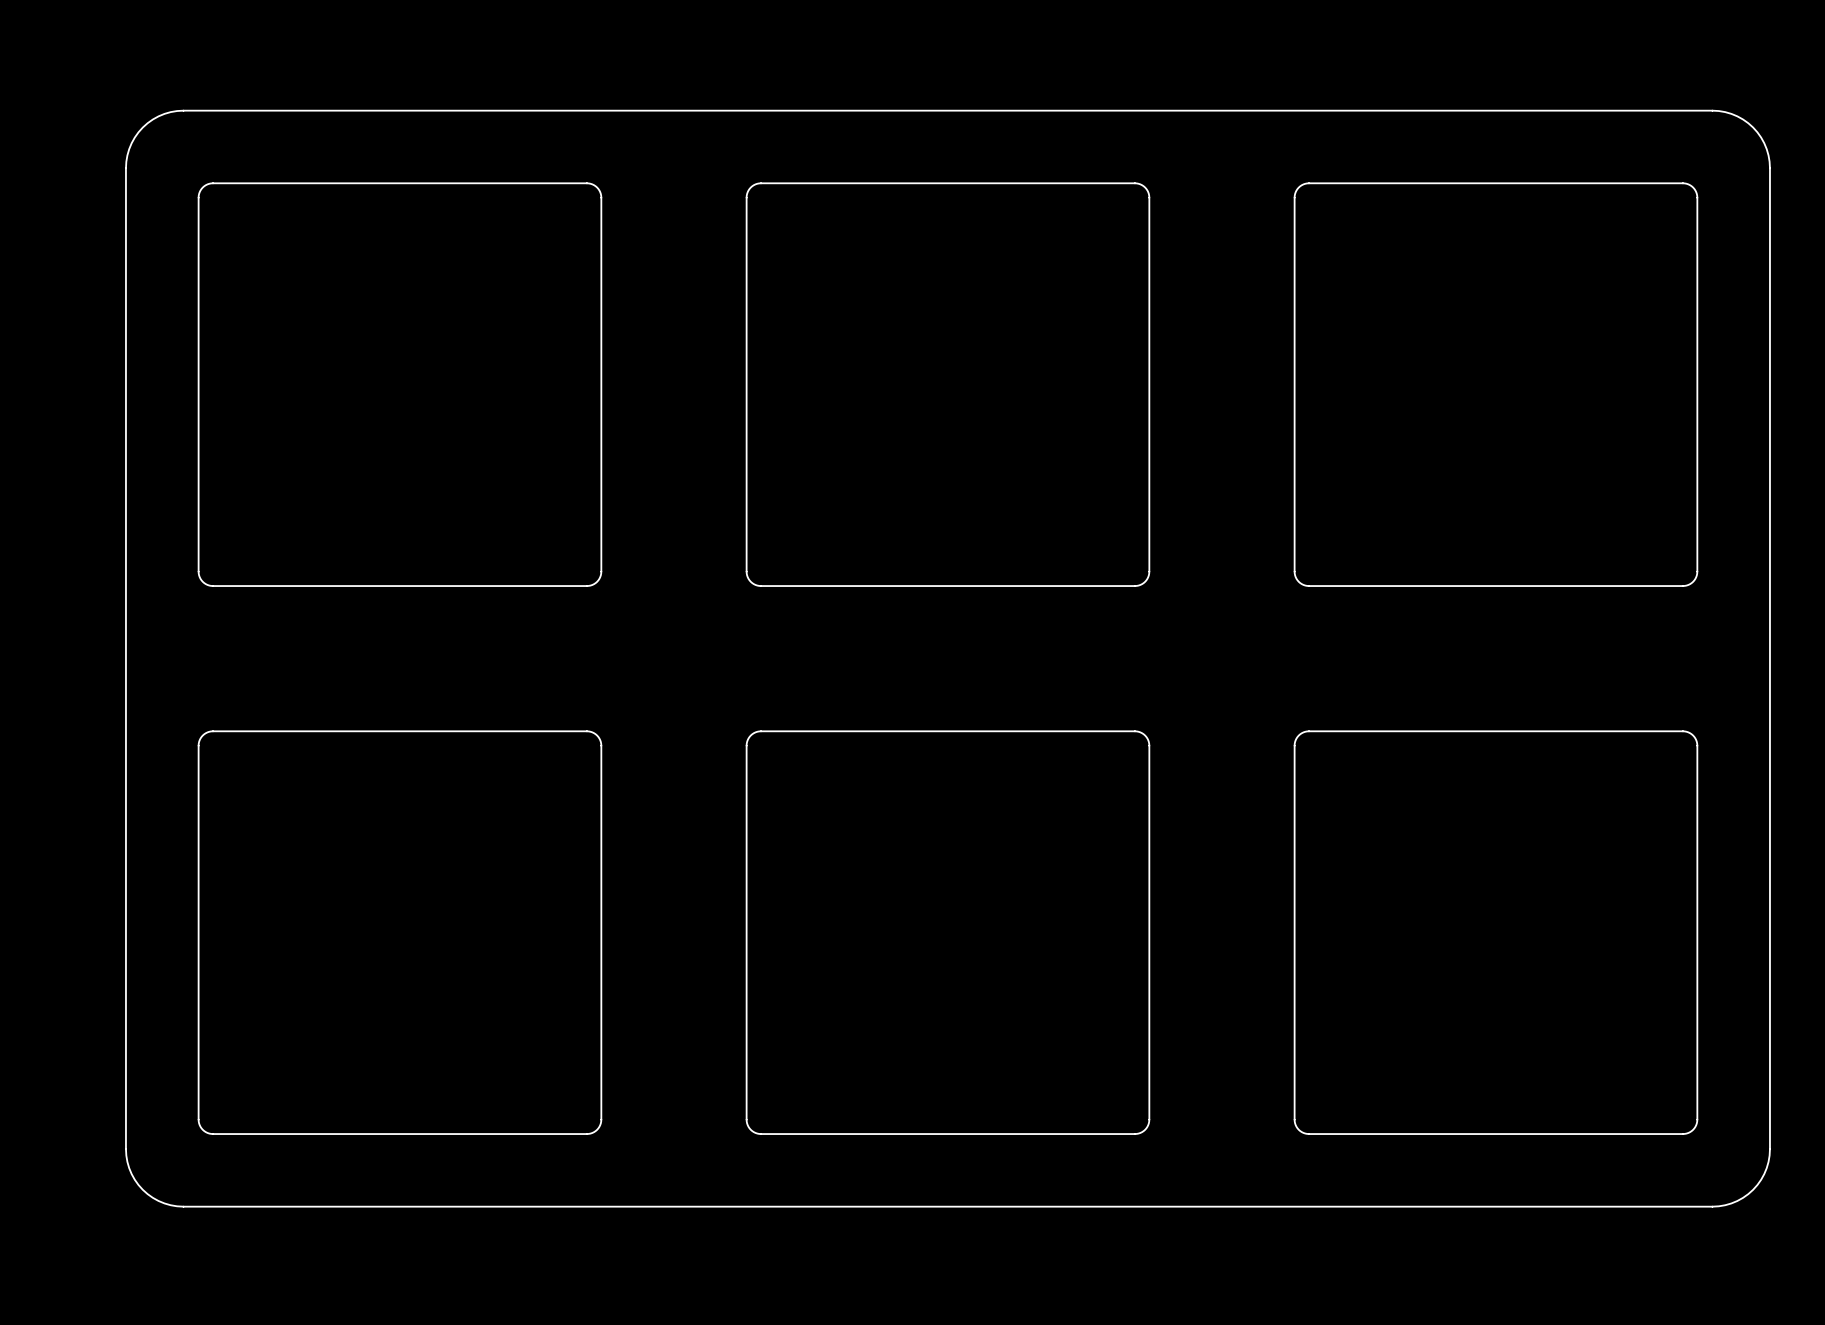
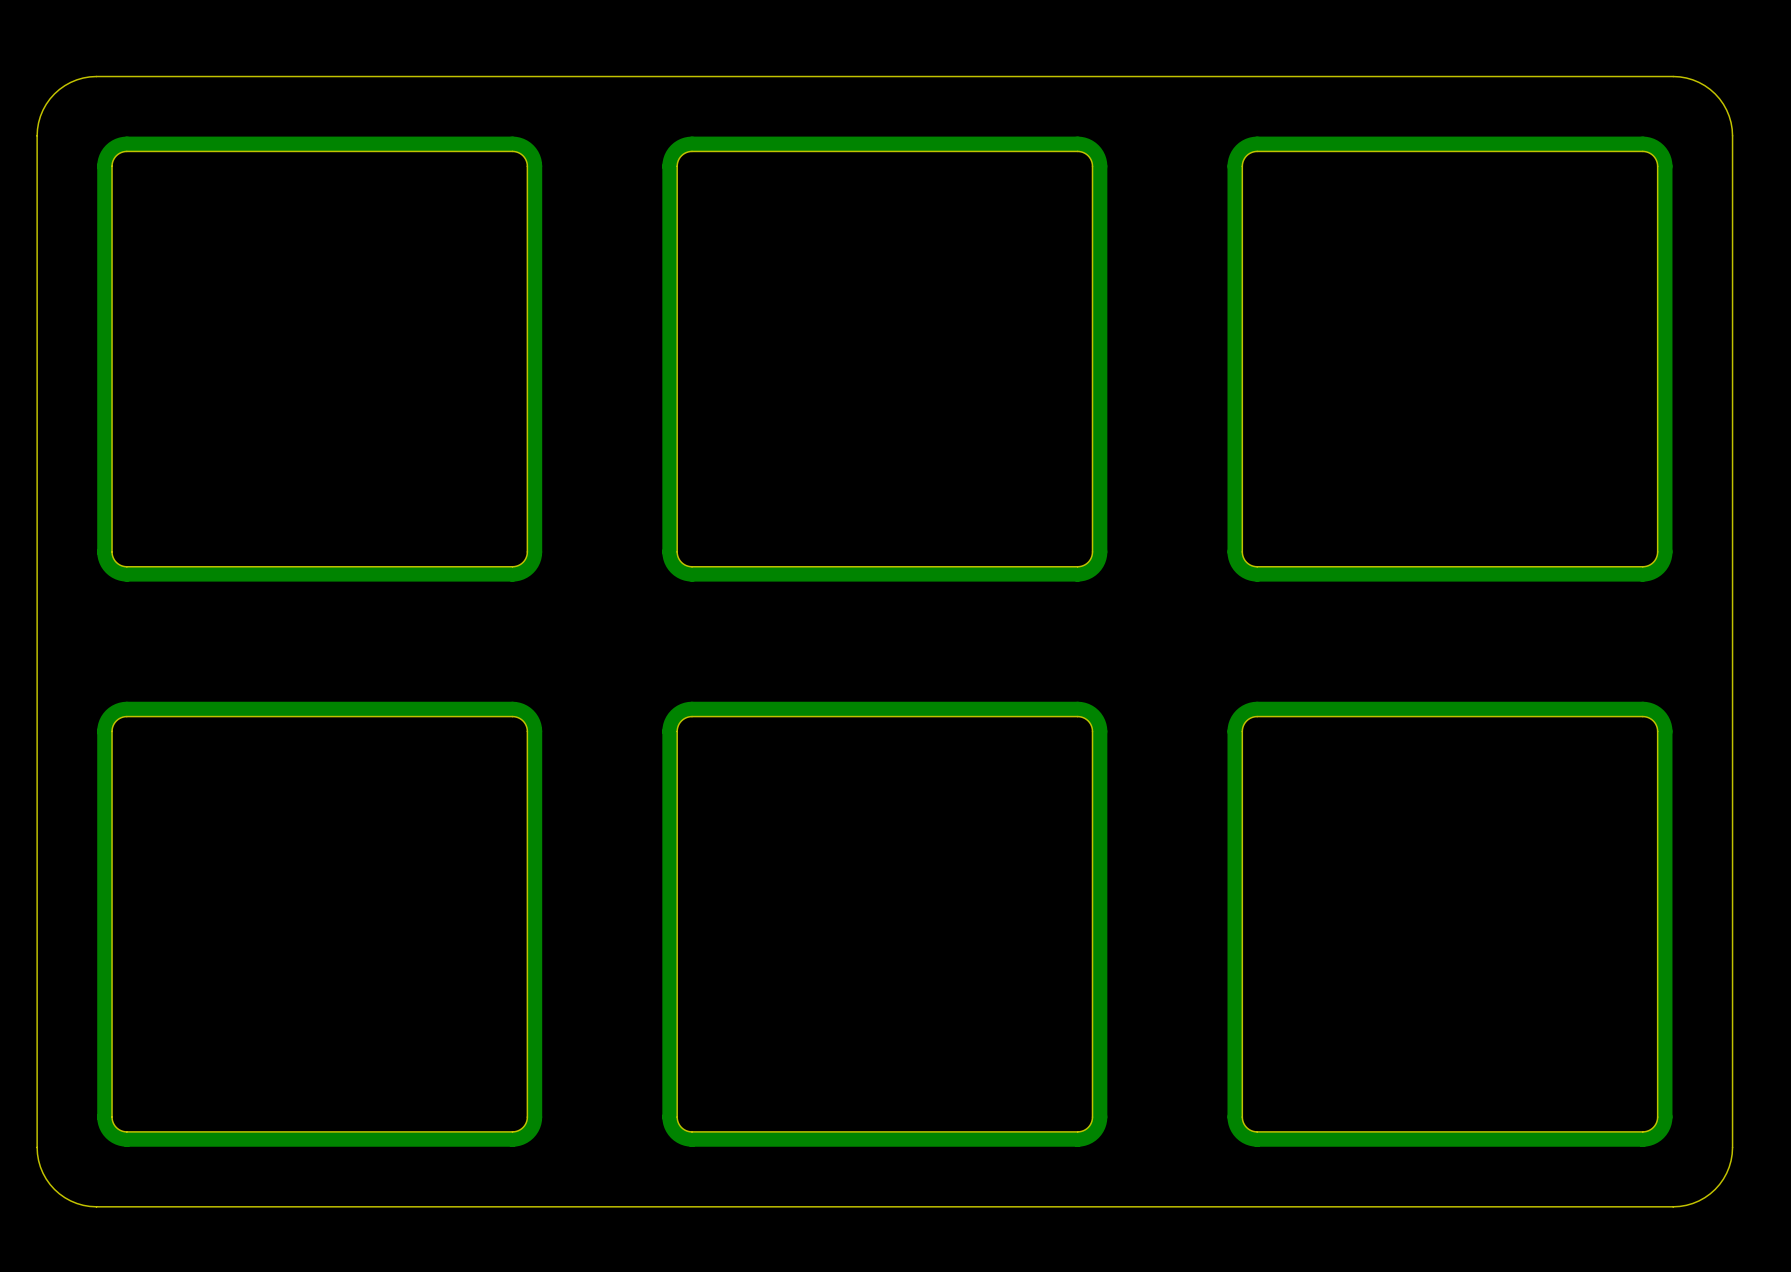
drawing shape: [197, 182, 603, 587] -> [97, 136, 543, 582]
drawing shape: [745, 182, 1151, 587] -> [662, 136, 1108, 582]
drawing shape: [1293, 182, 1699, 587] -> [1227, 136, 1673, 582]
drawing shape: [197, 730, 603, 1135] -> [97, 701, 543, 1147]
drawing shape: [745, 730, 1151, 1135] -> [662, 701, 1108, 1147]
drawing shape: [1293, 730, 1699, 1135] -> [1227, 701, 1673, 1147]

